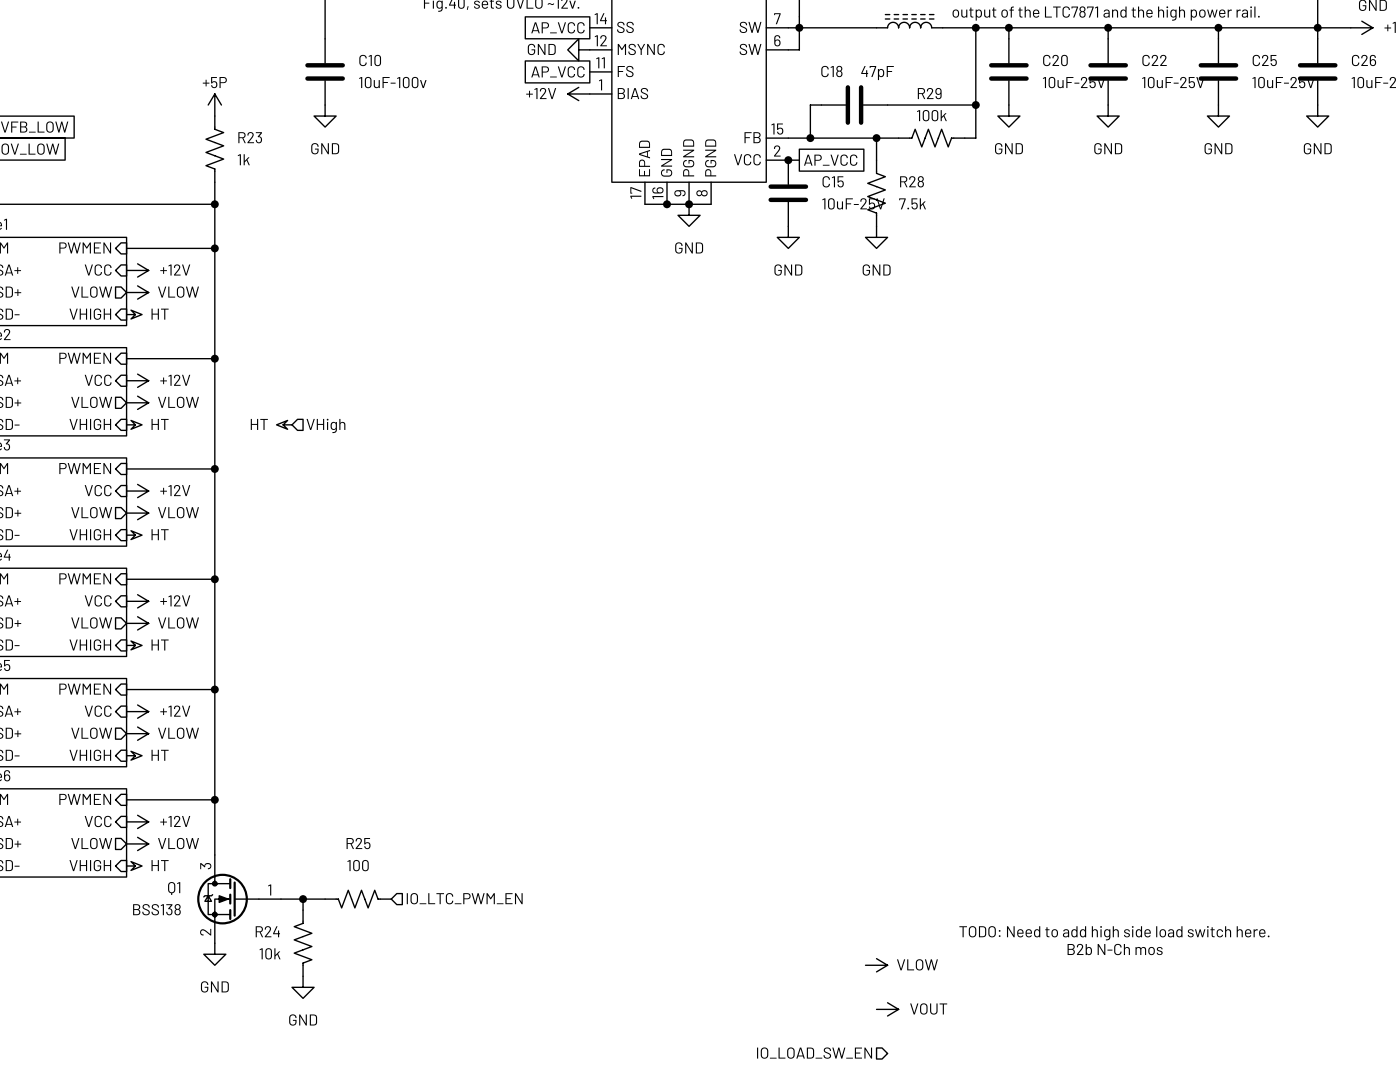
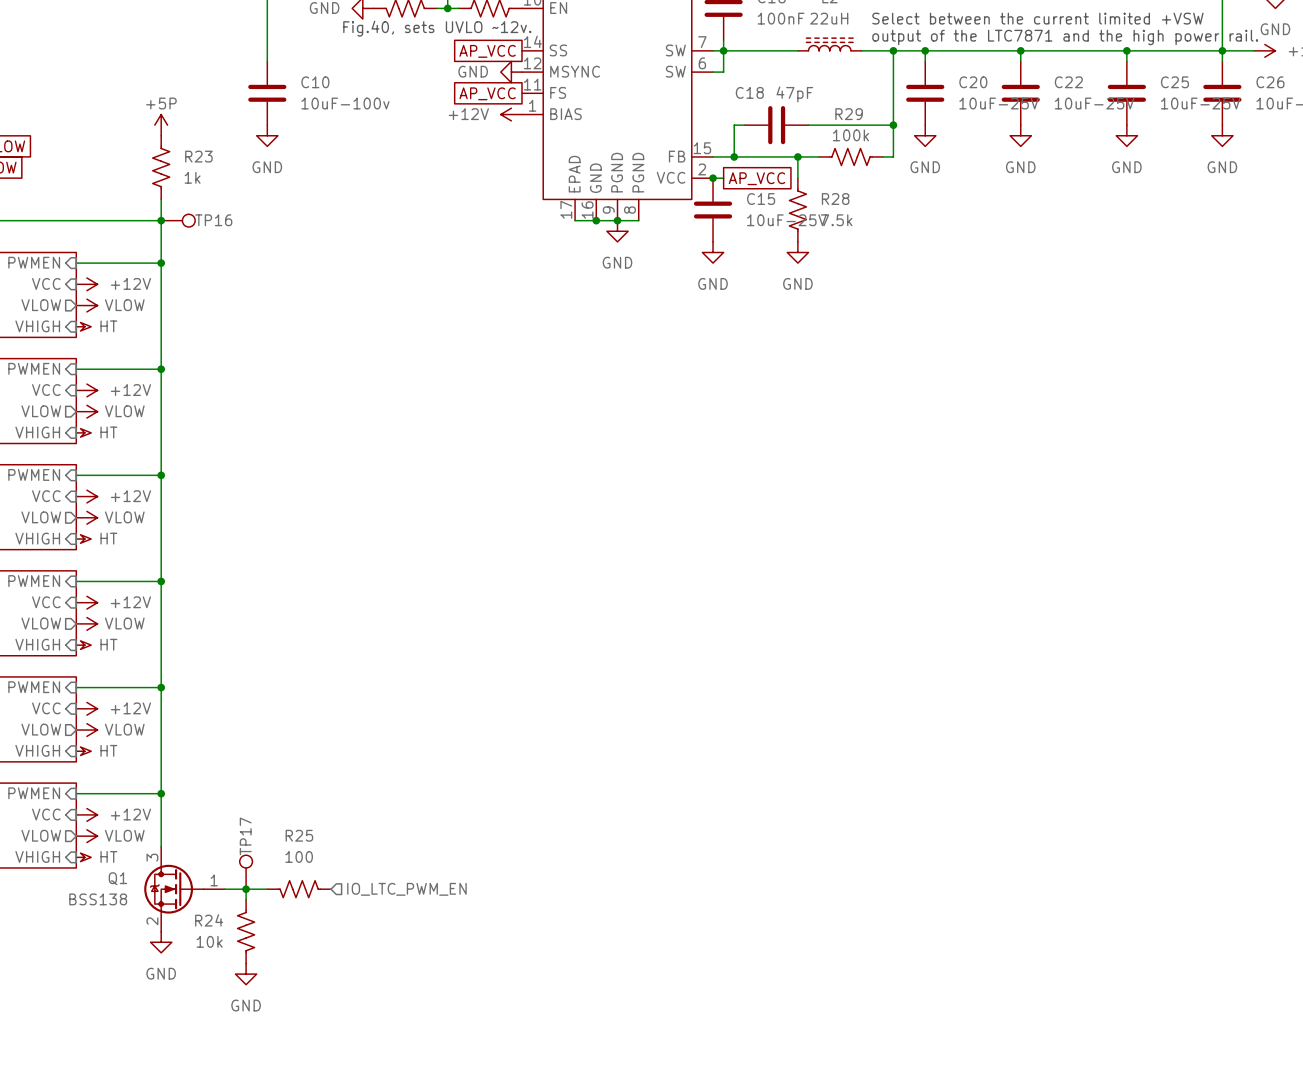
TP16: none -> (178, 220)
power symbol: HT (284, 424) -> none
hierarchical label: VHigh (325, 425) -> none
TP17: none -> (246, 872)
text: TODO: Need to add high side load switch here. (1114, 933) -> none
text: B2b N-Ch mos (1115, 949) -> none
power symbol: VLOW (876, 965) -> none
power symbol: VOUT (887, 1009) -> none
hierarchical label: IO_LOAD_SW_EN (814, 1053) -> none

